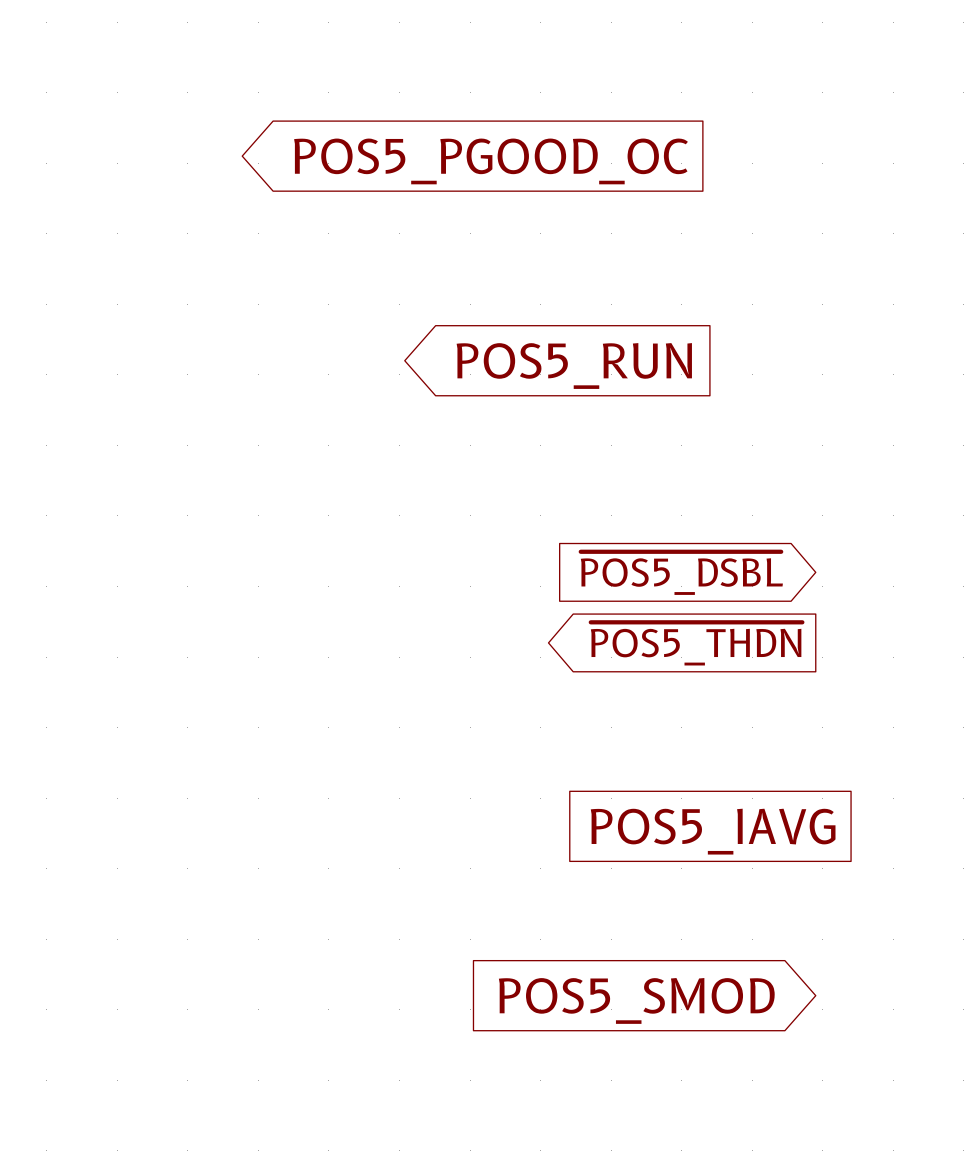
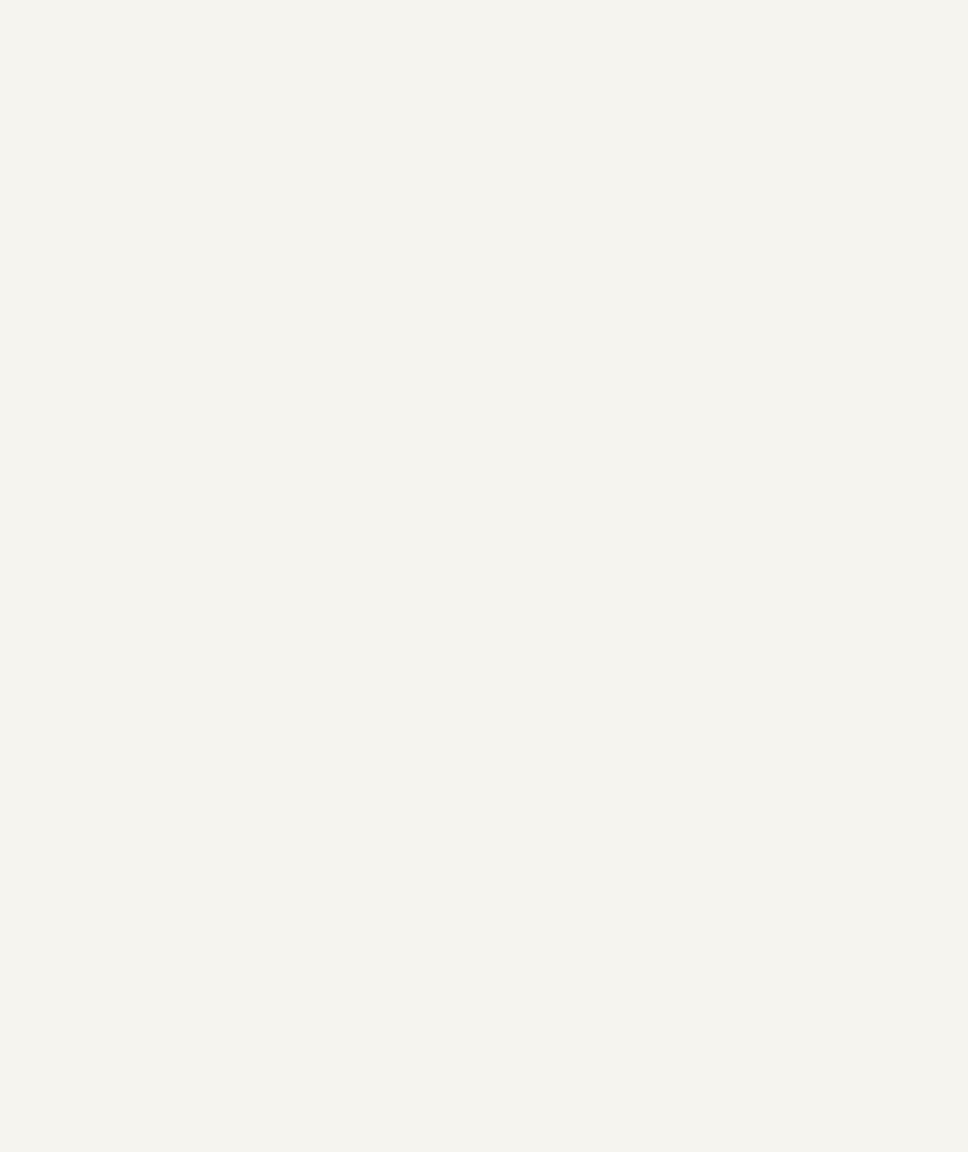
global label: POS5_PGOOD_OC (490, 161) -> none
global label: POS5_RUN (574, 366) -> none
global label: ~{POS5_DSBL} (681, 573) -> none
global label: ~{POS5_THDN} (696, 643) -> none
global label: POS5_IAVG (713, 831) -> none
global label: POS5_SMOD (636, 1000) -> none

